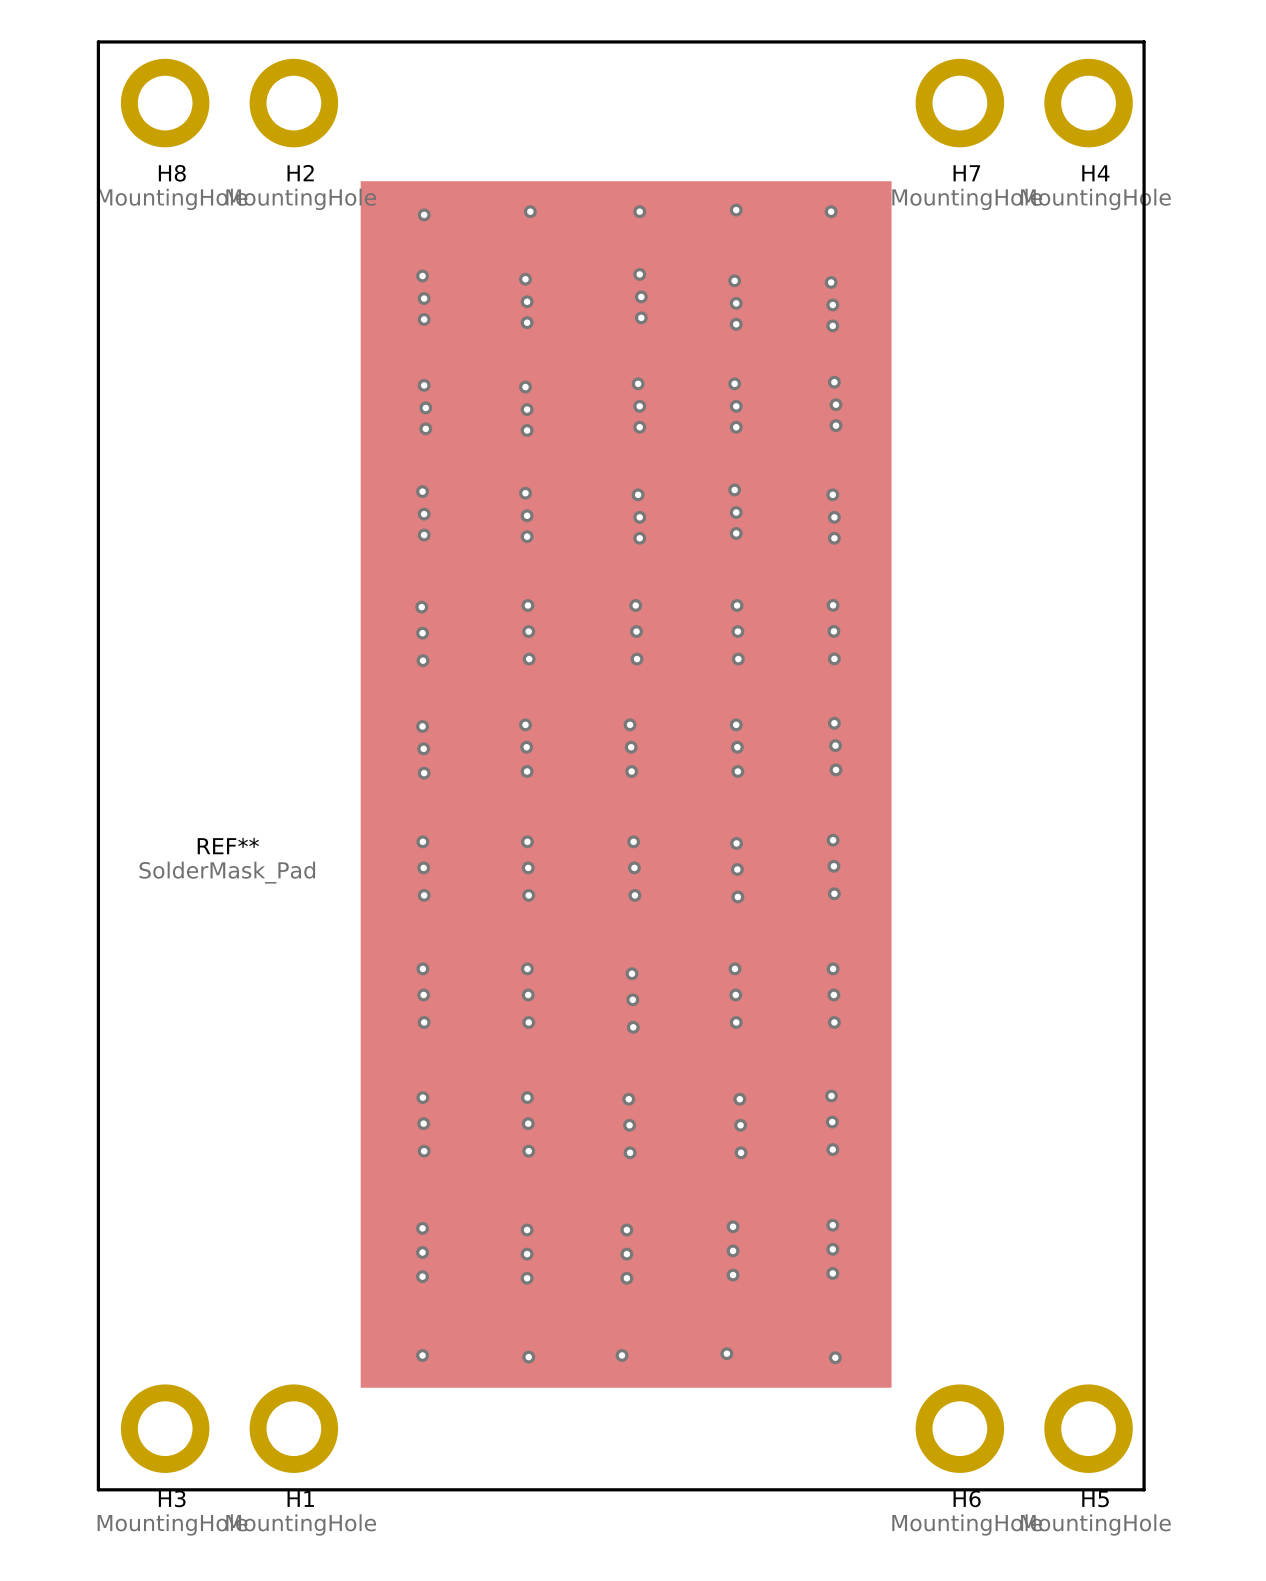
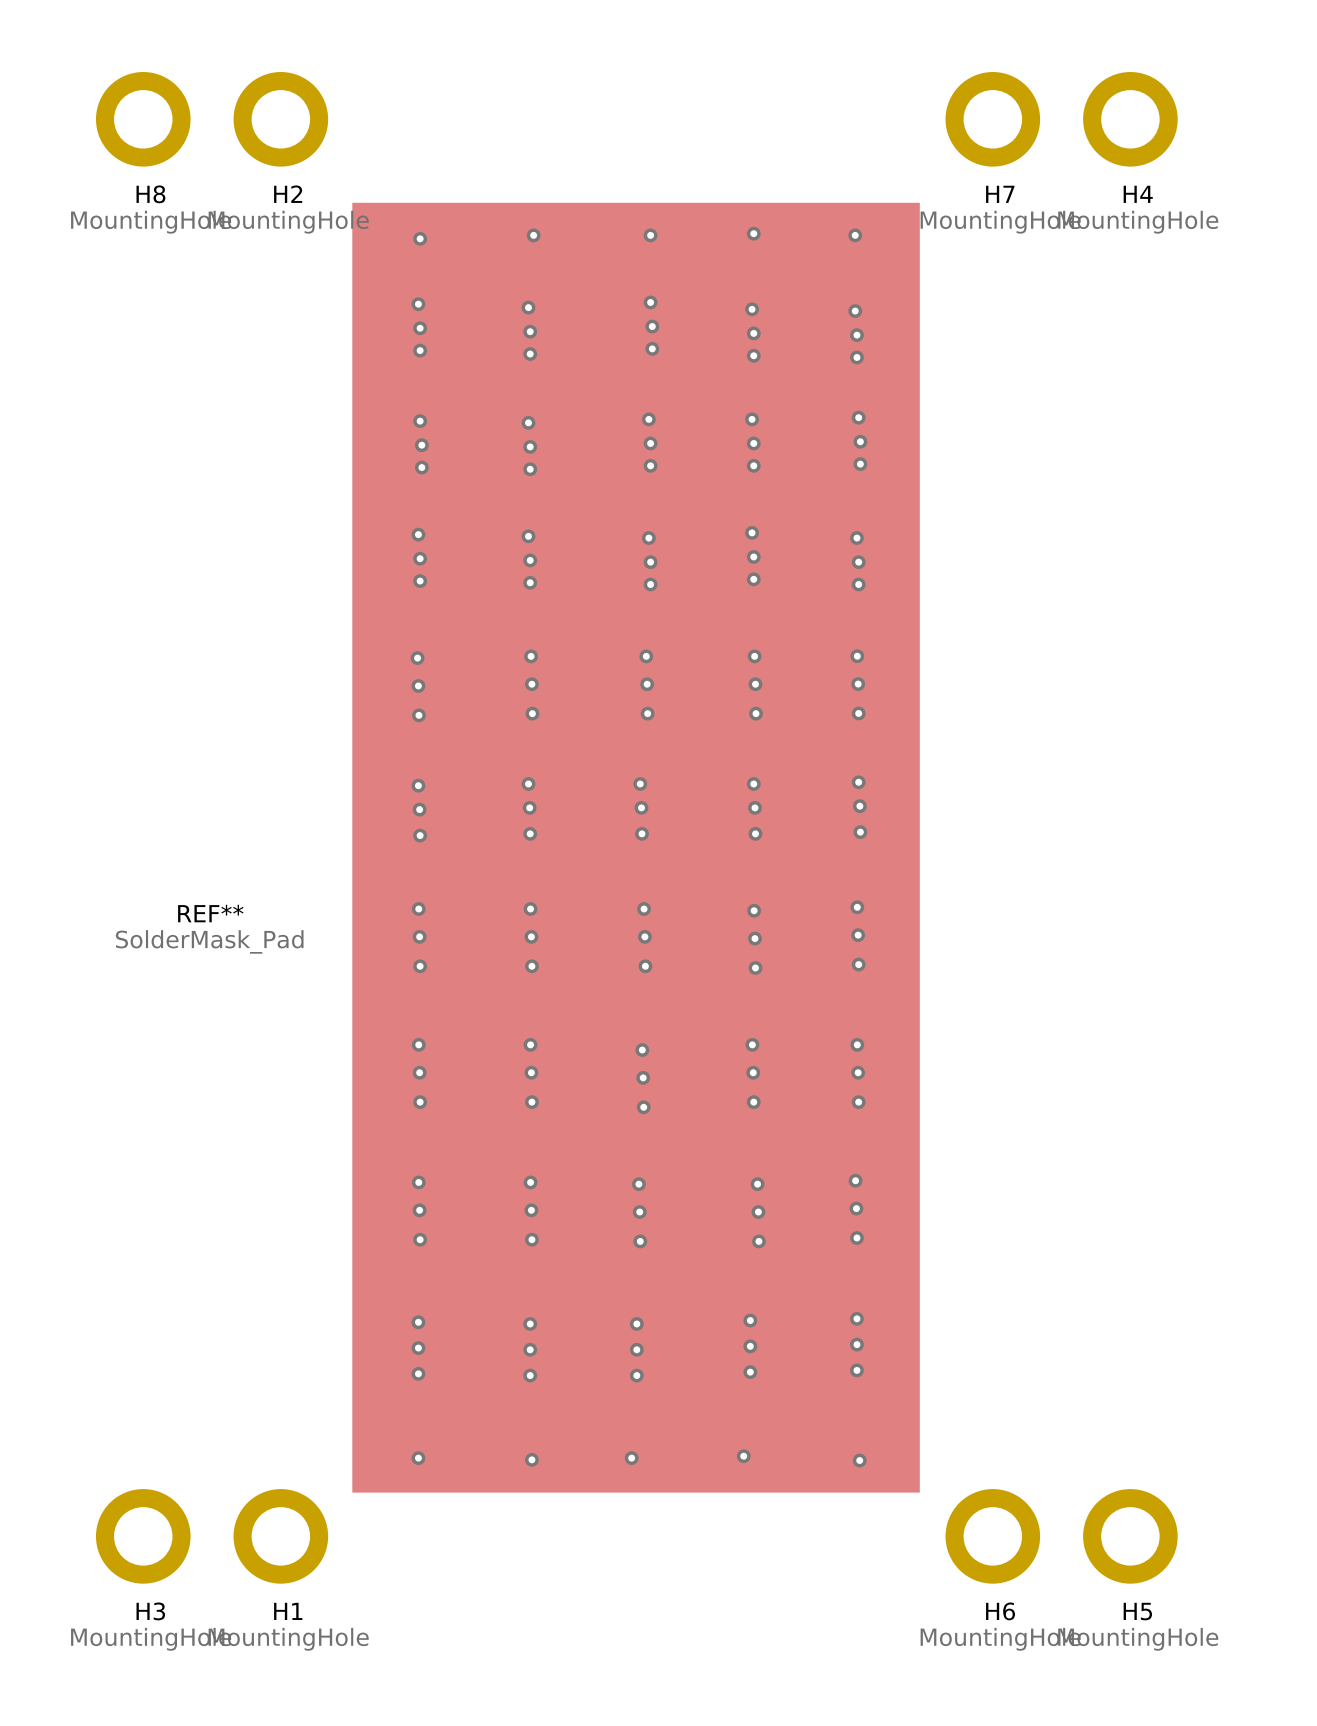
board edge: (98, 41) (98, 1489) (1144, 1489) (1144, 41) (98, 41) -> none

